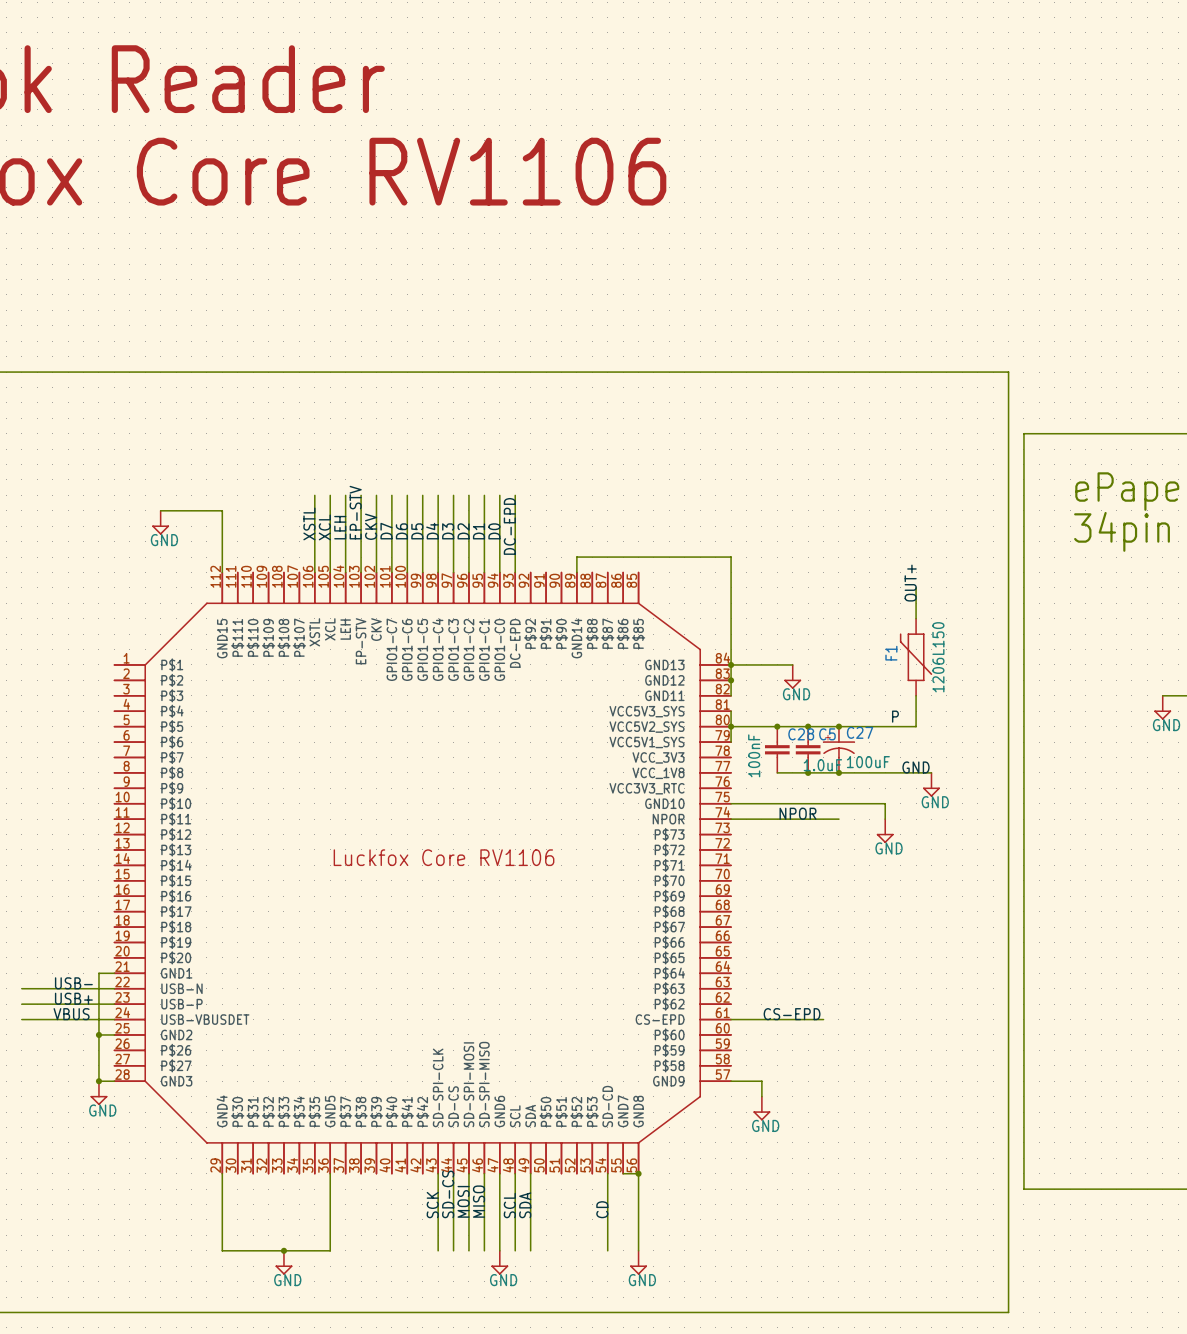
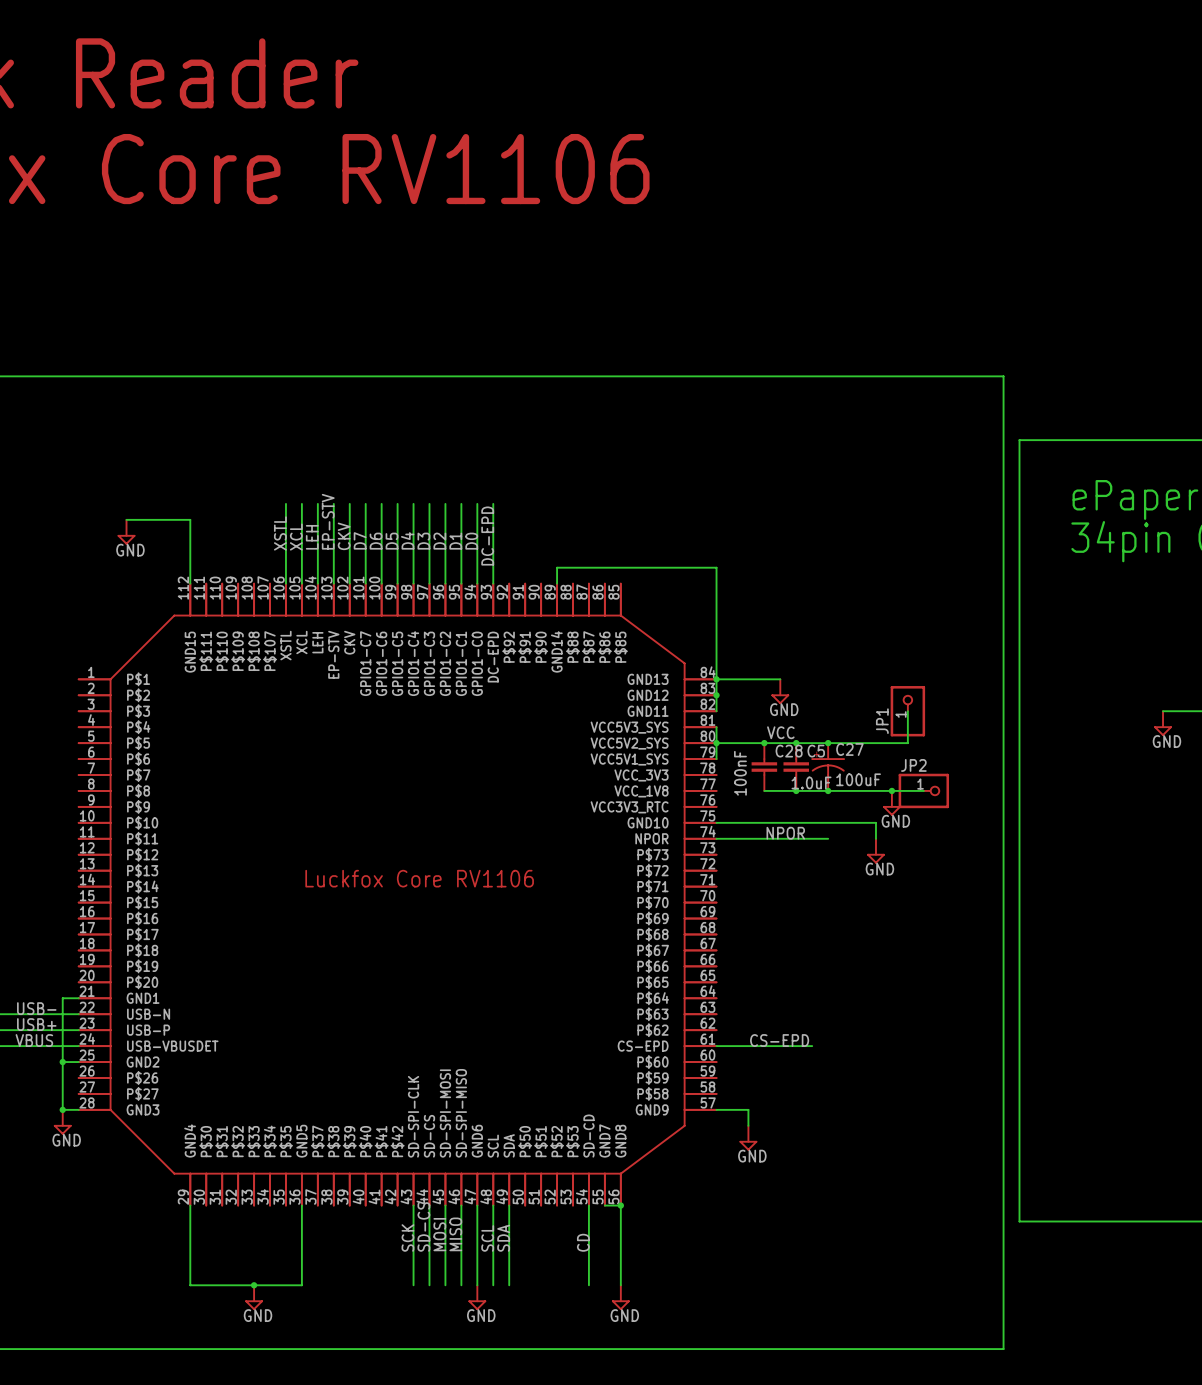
label: OUT+ (910, 583) -> none
wire: (916, 587) (916, 618) -> none
F1: 1206L150 (916, 657) -> none
JP1: none -> (907, 711)
label: none -> VCC (780, 732)
label: P (895, 716) -> none
label: GND (916, 767) -> none
junction: none -> (891, 790)
JP2: none -> (923, 790)
power symbol position: GND (931, 784) -> GND (891, 803)

